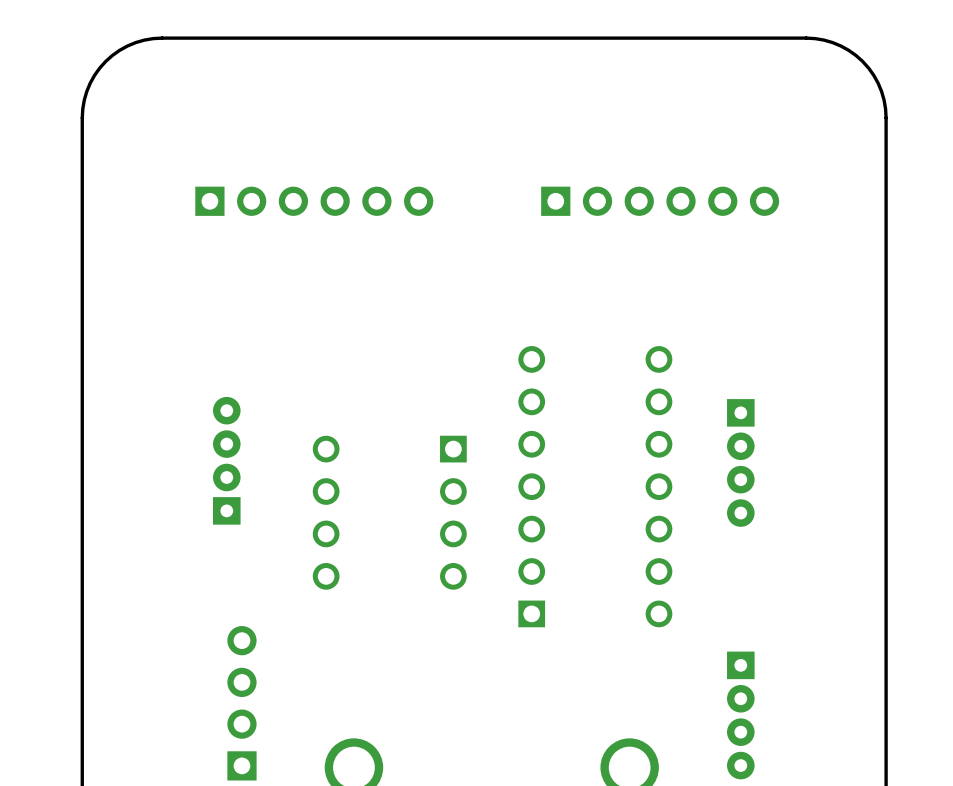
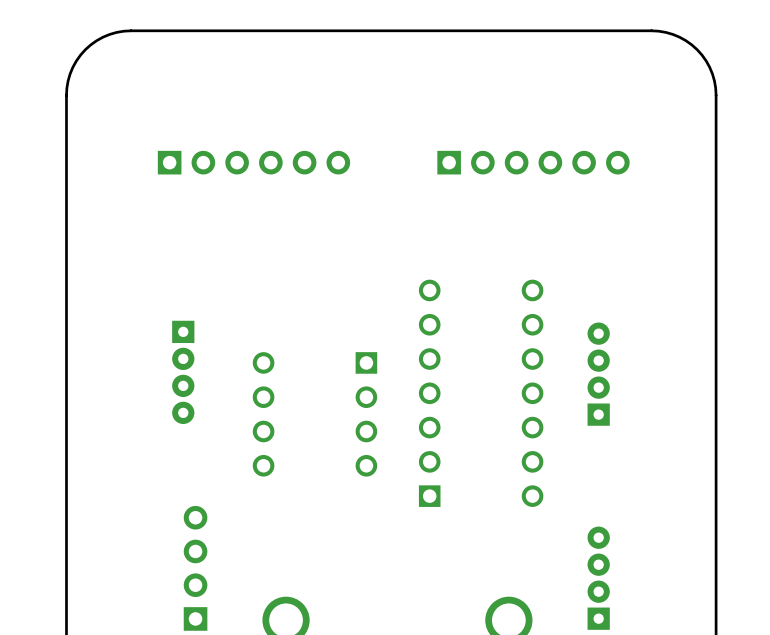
part rotation: 0° (226, 460) -> 180° (183, 372)
part rotation: 0° (740, 462) -> 180° (598, 374)
part rotation: 0° (740, 715) -> 180° (598, 578)

